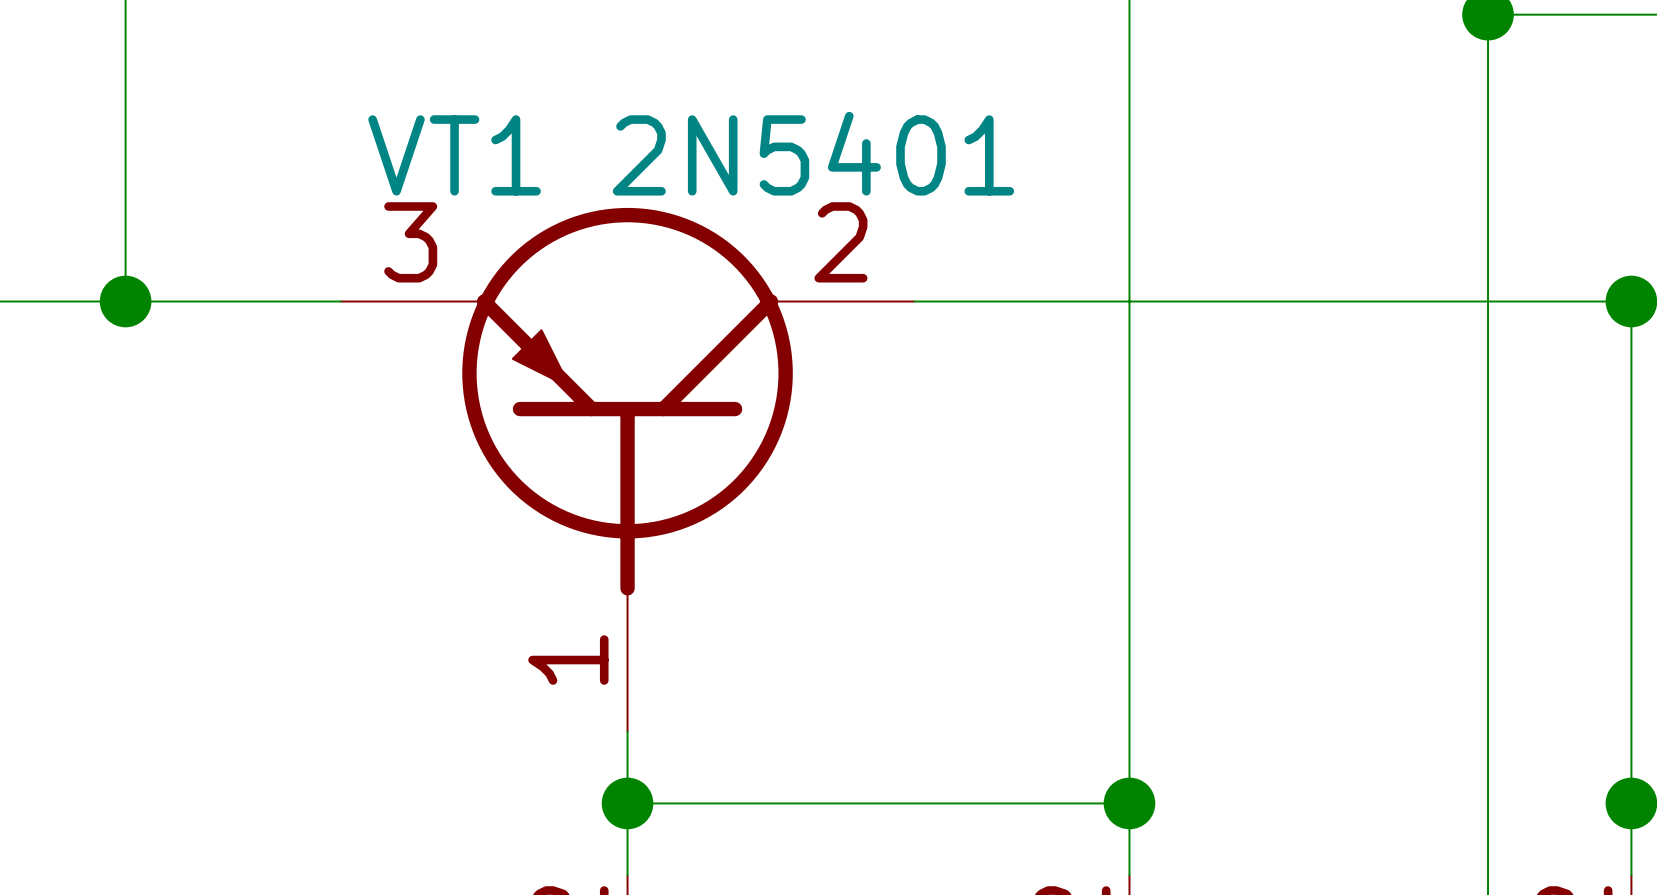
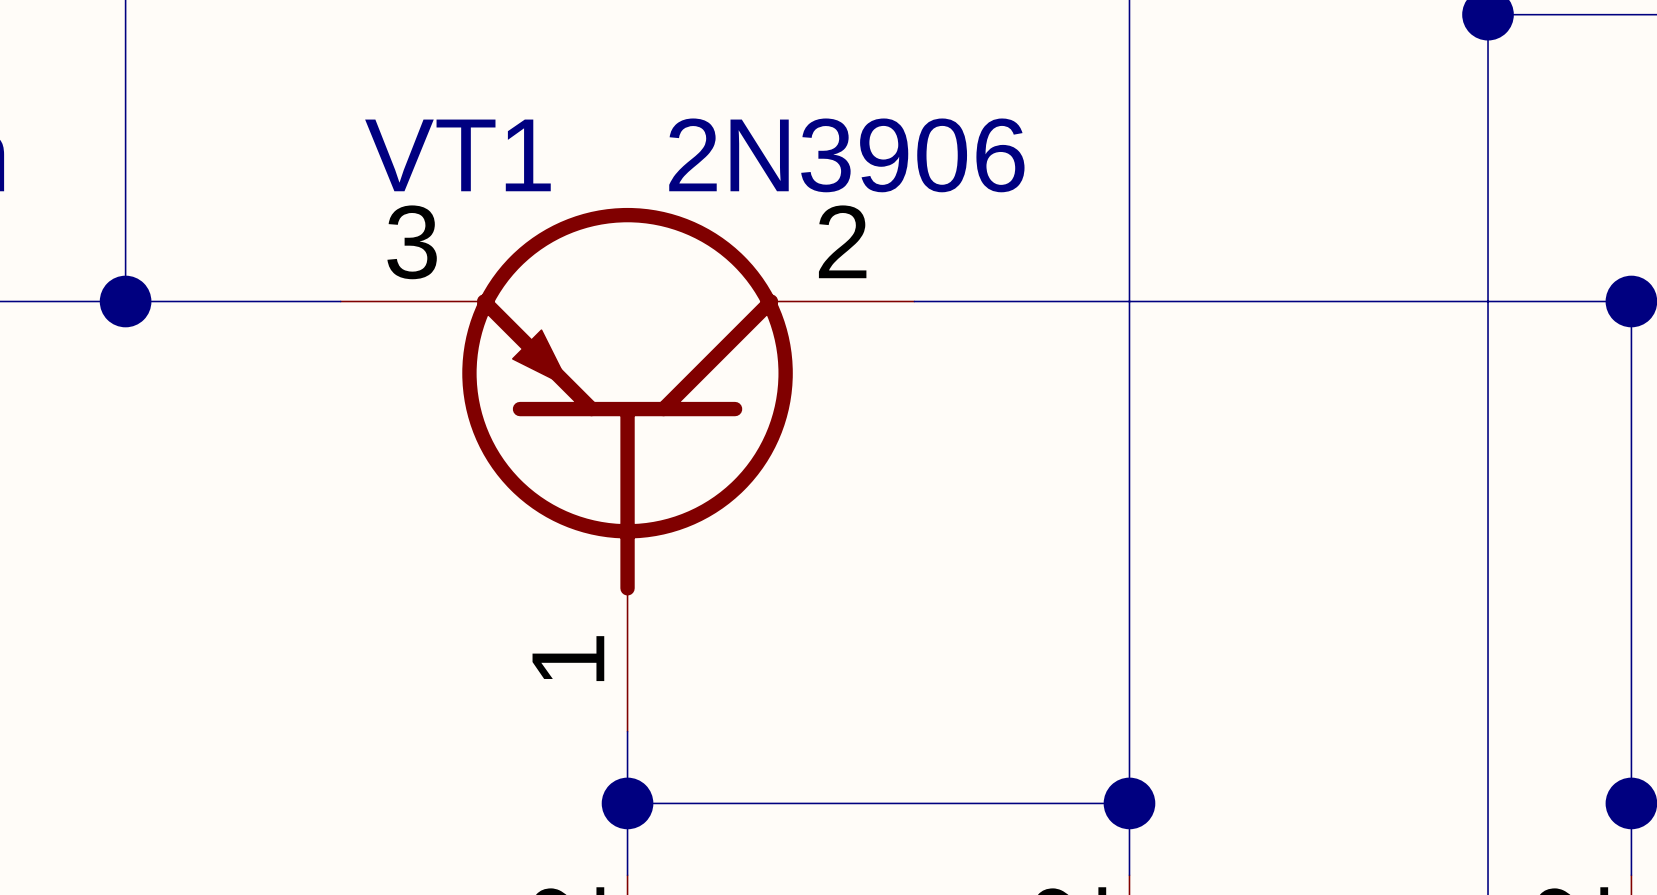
VT1 value: 2N5401 (813, 153) -> 2N3906 (846, 155)

